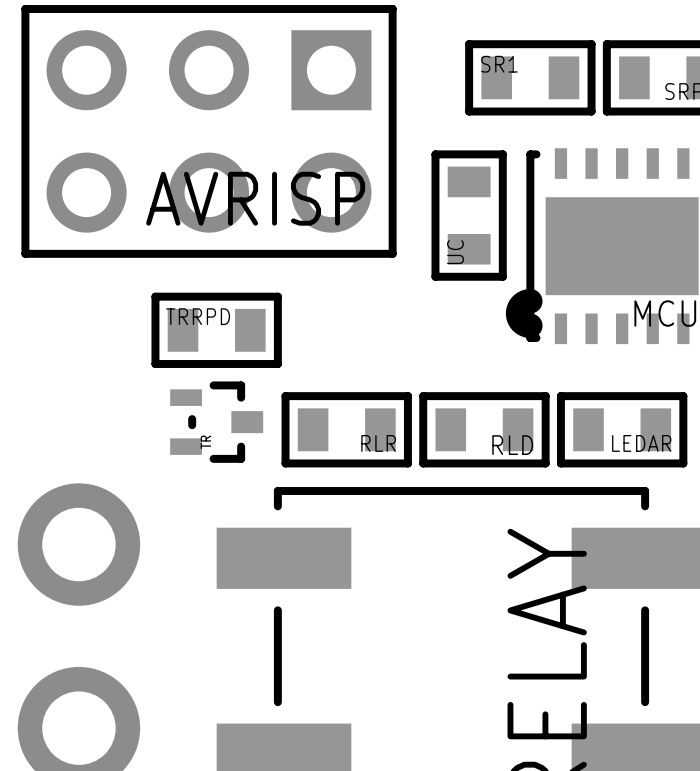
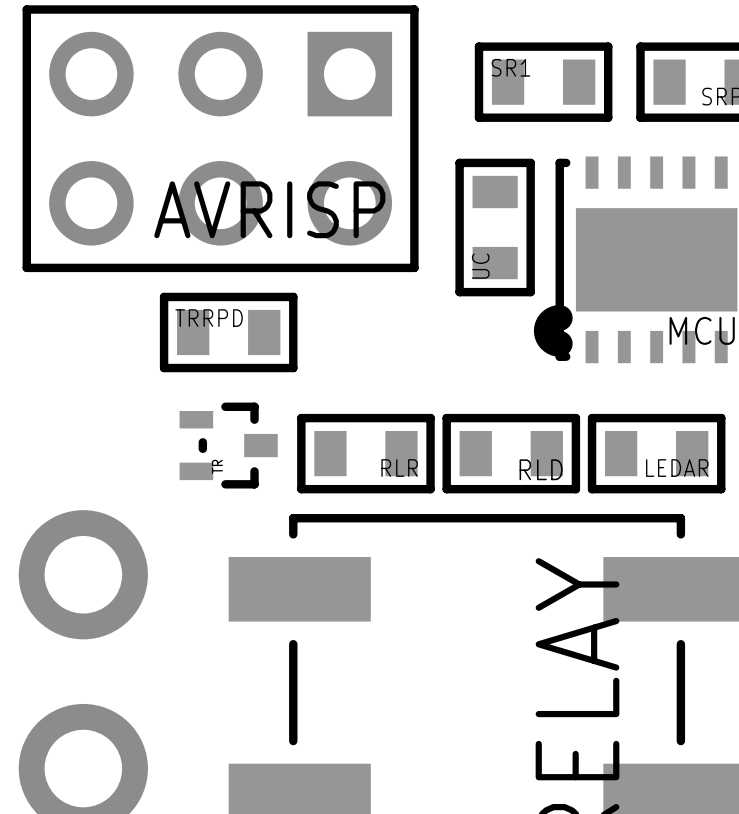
SR1 position: (530, 77) -> (543, 82)
TRRPD position: (216, 330) -> (228, 332)

